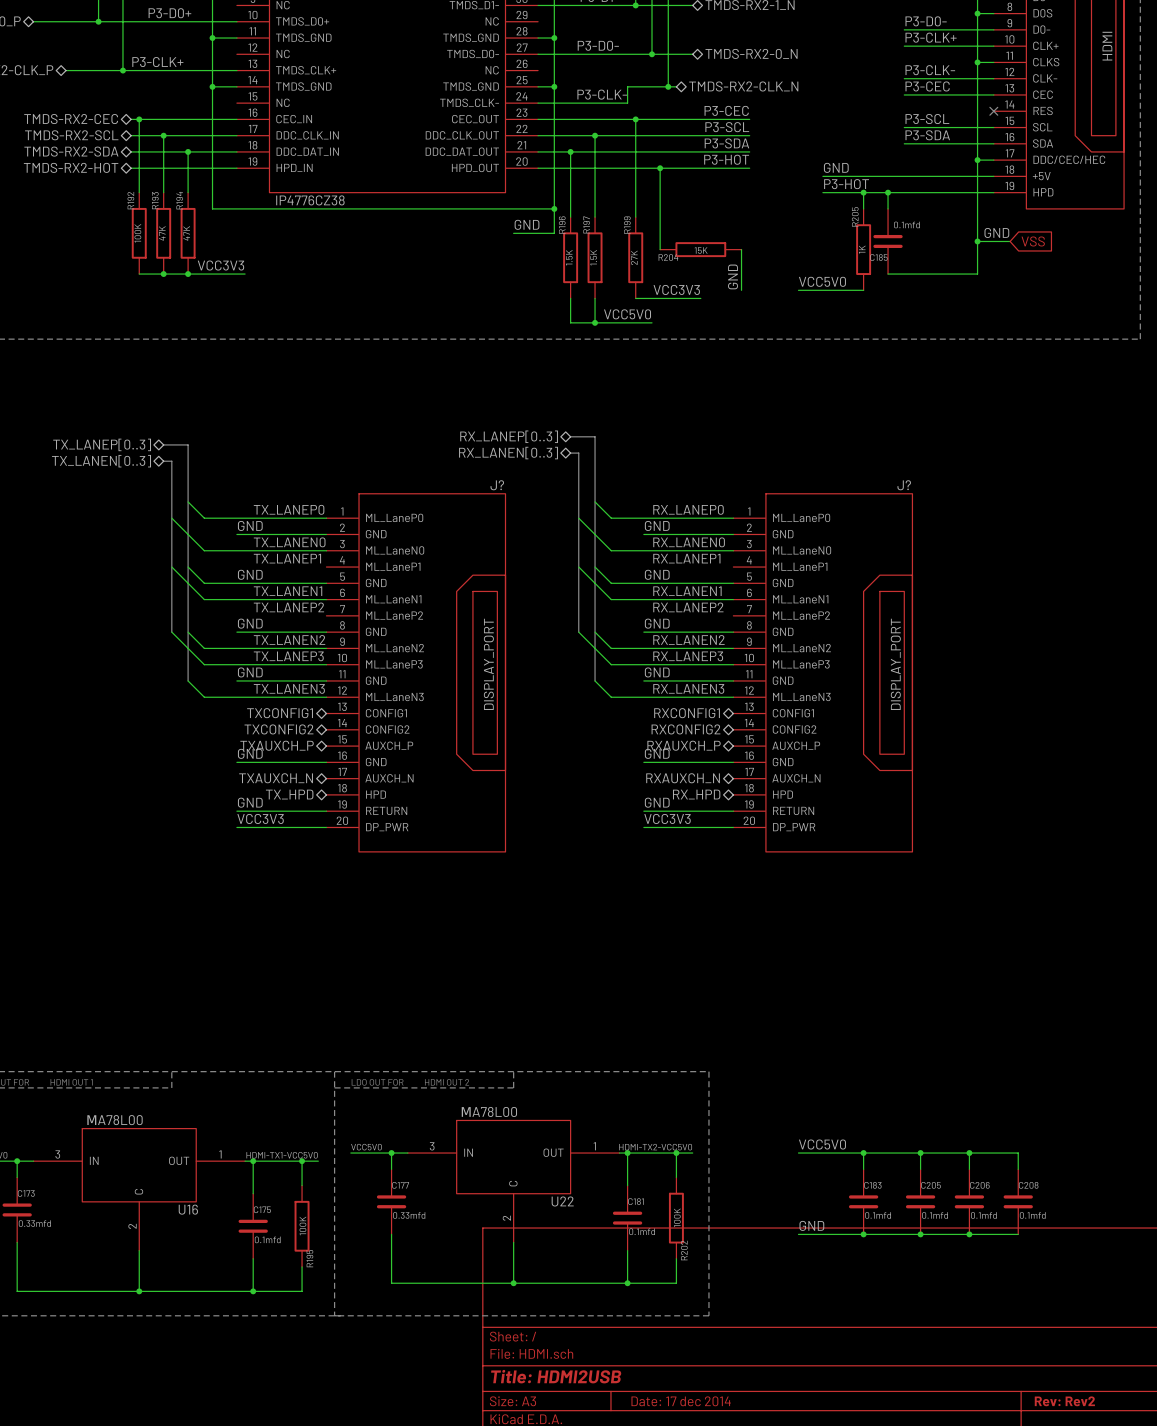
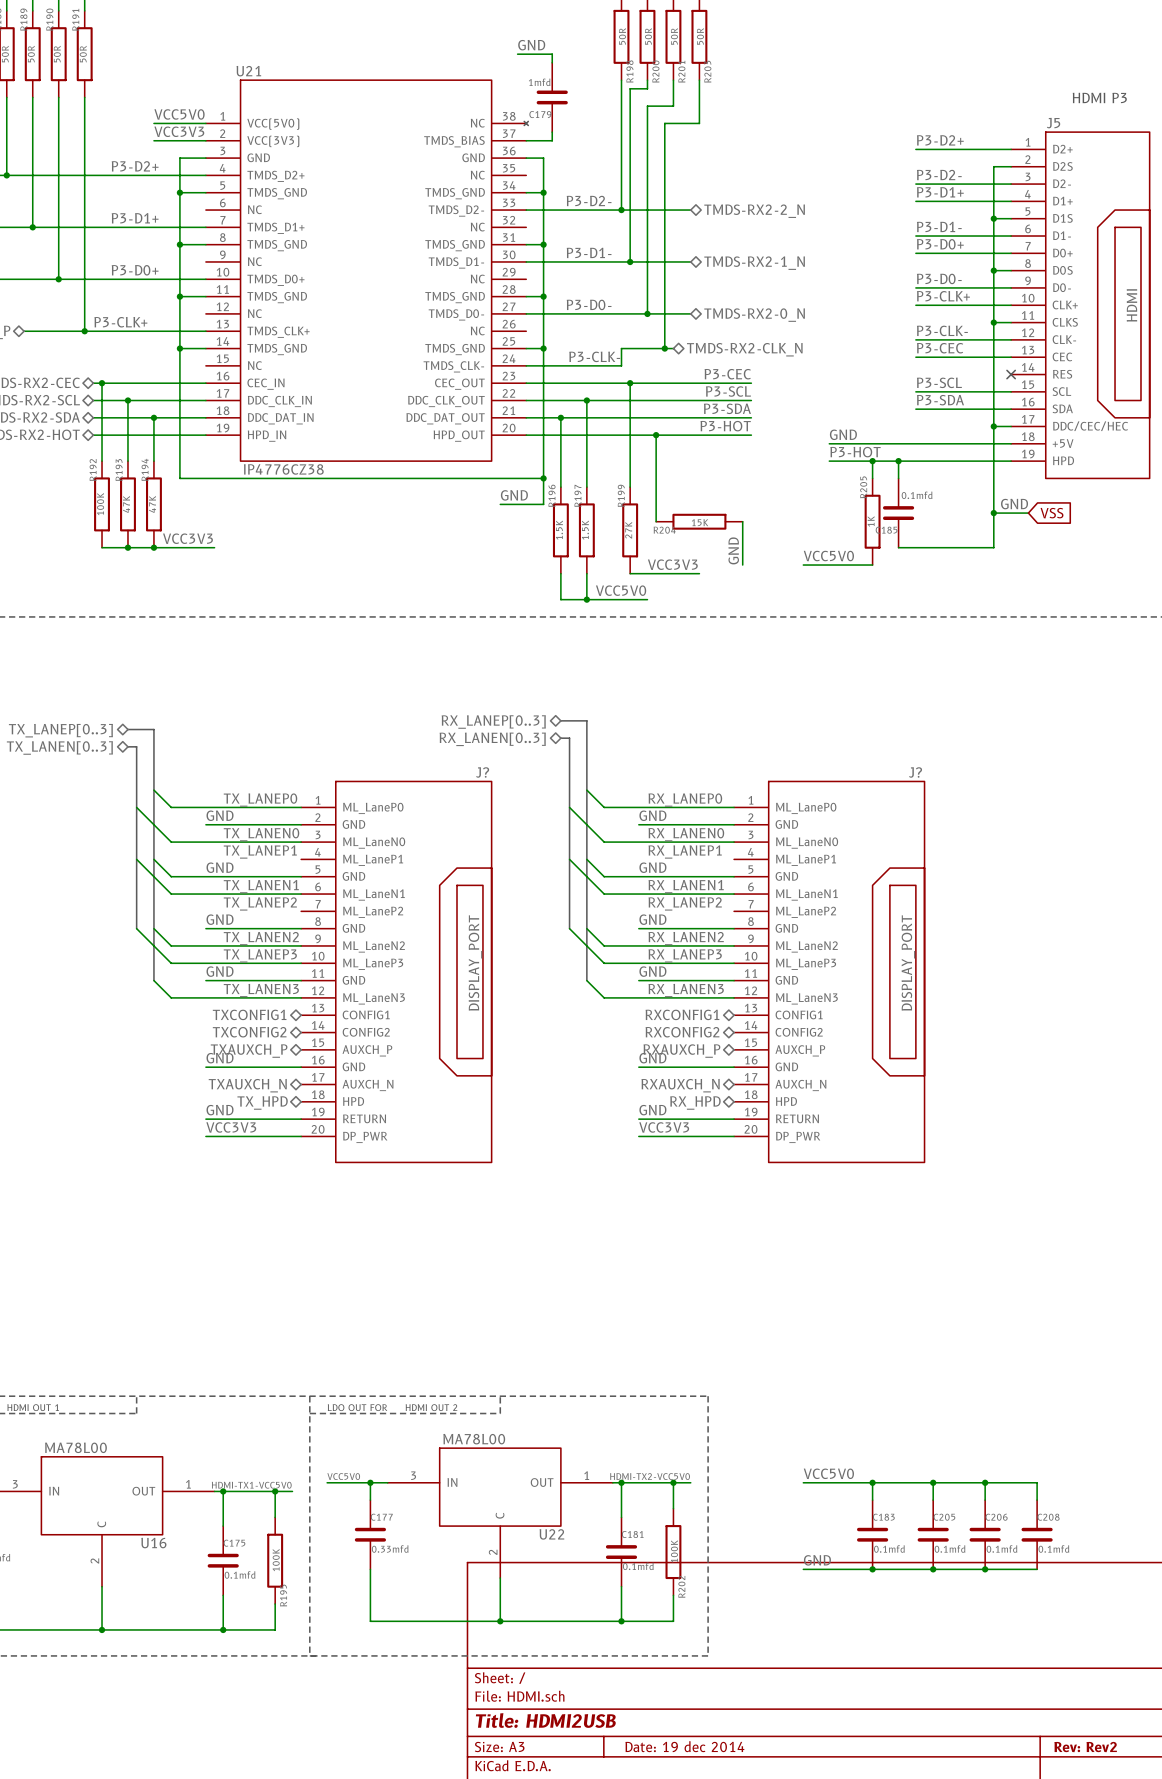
title block: Date: 17 dec 2014 (681, 1401) -> Date: 19 dec 2014 (684, 1746)

